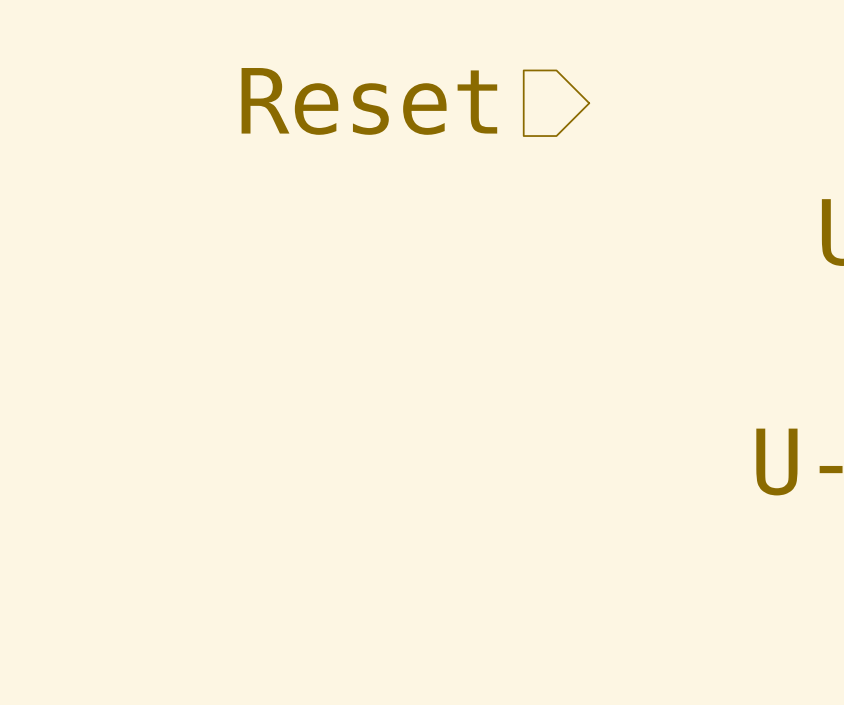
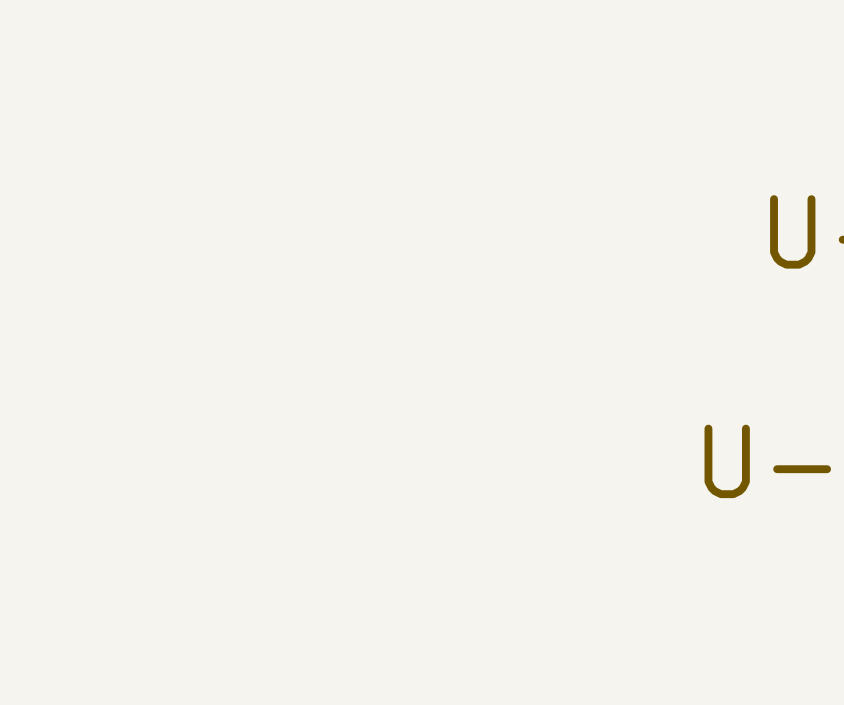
hierarchical label: Reset (369, 101) -> none

